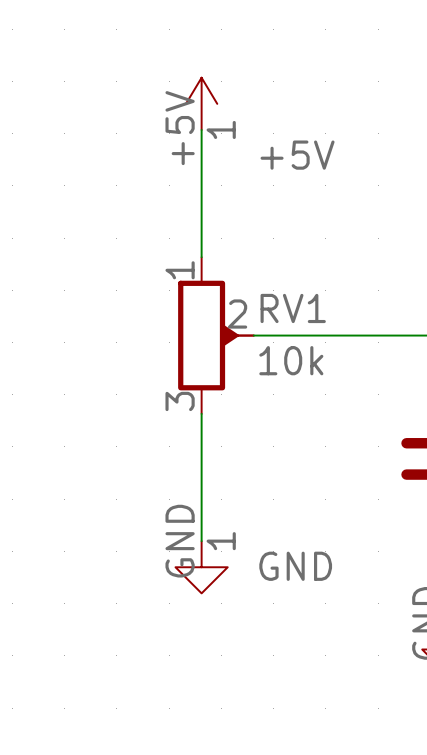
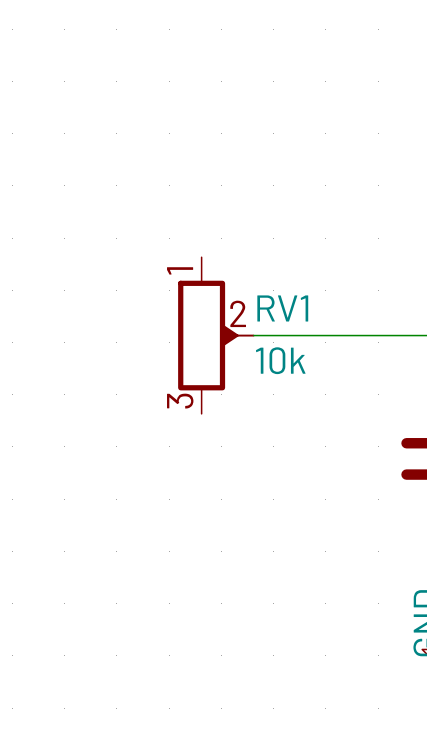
power symbol: +5V (201, 103) -> none
wire: (201, 129) (201, 257) -> none
wire: (201, 413) (201, 541) -> none
power symbol: GND (201, 567) -> none

